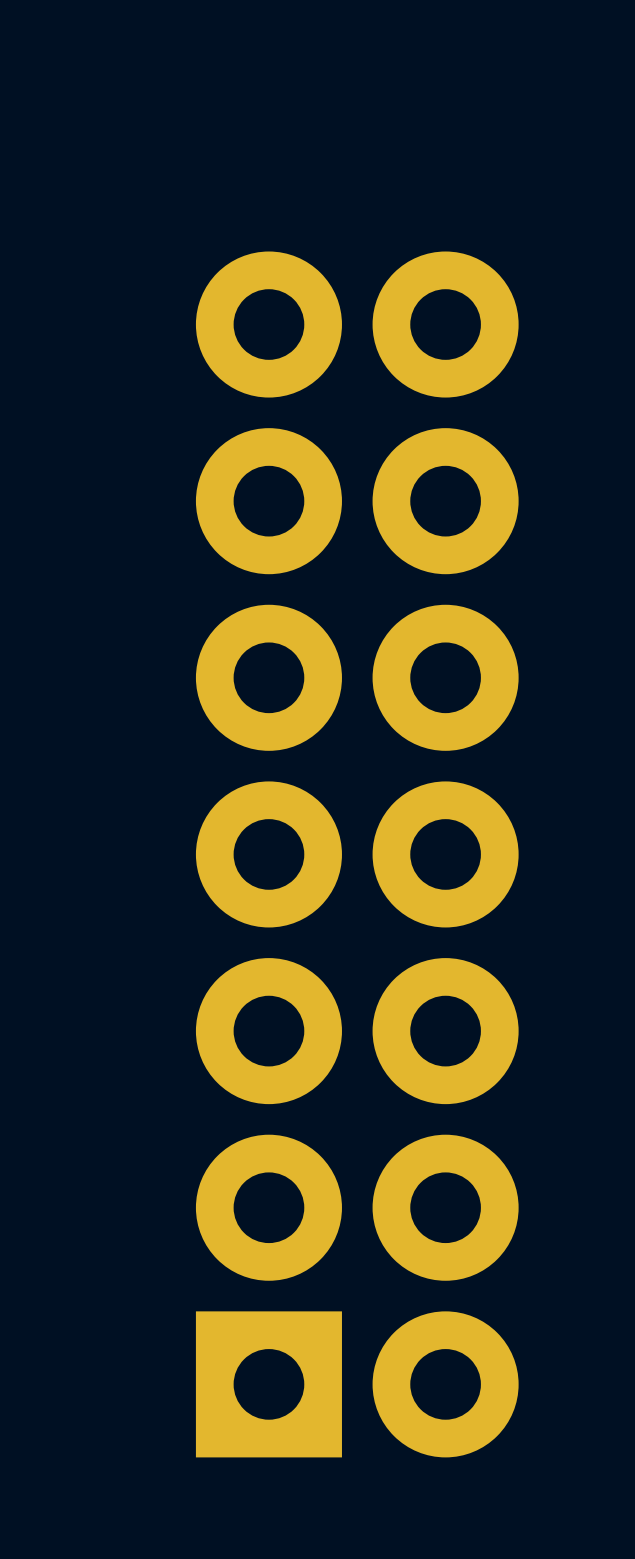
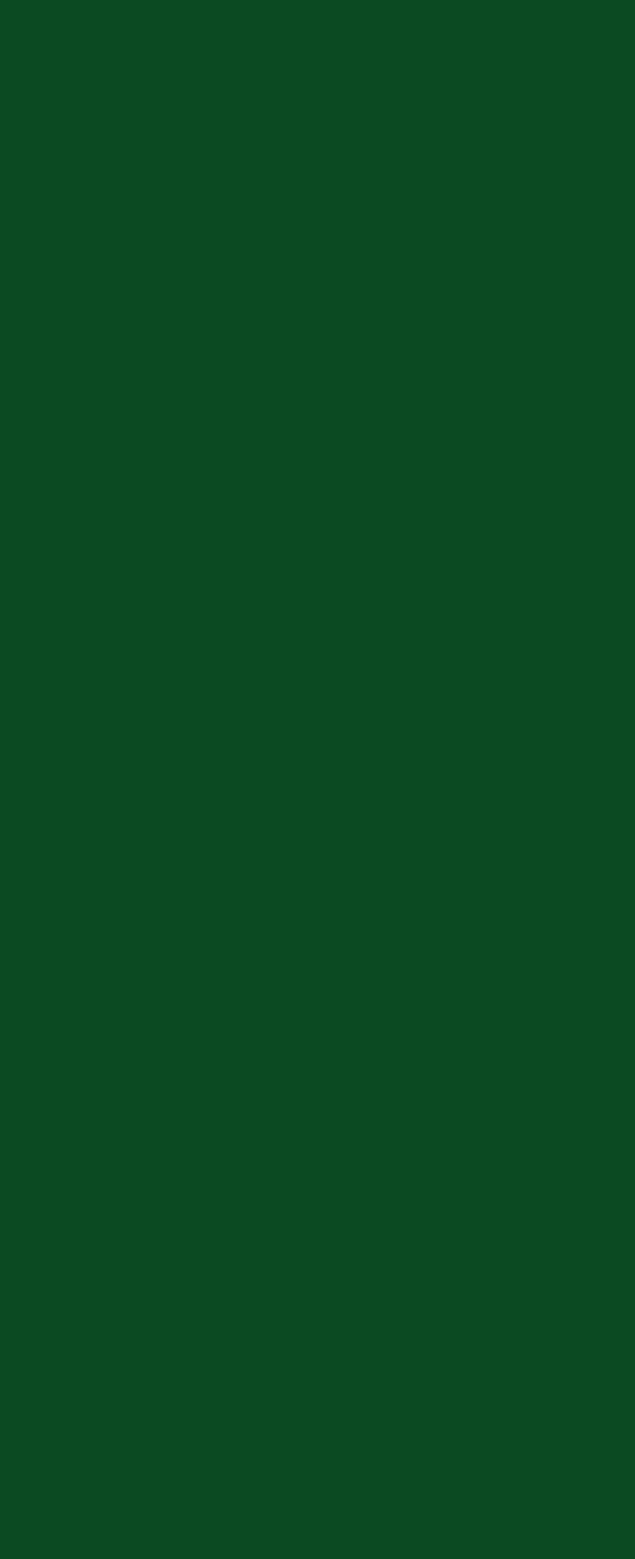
part: (357, 854) -> none

